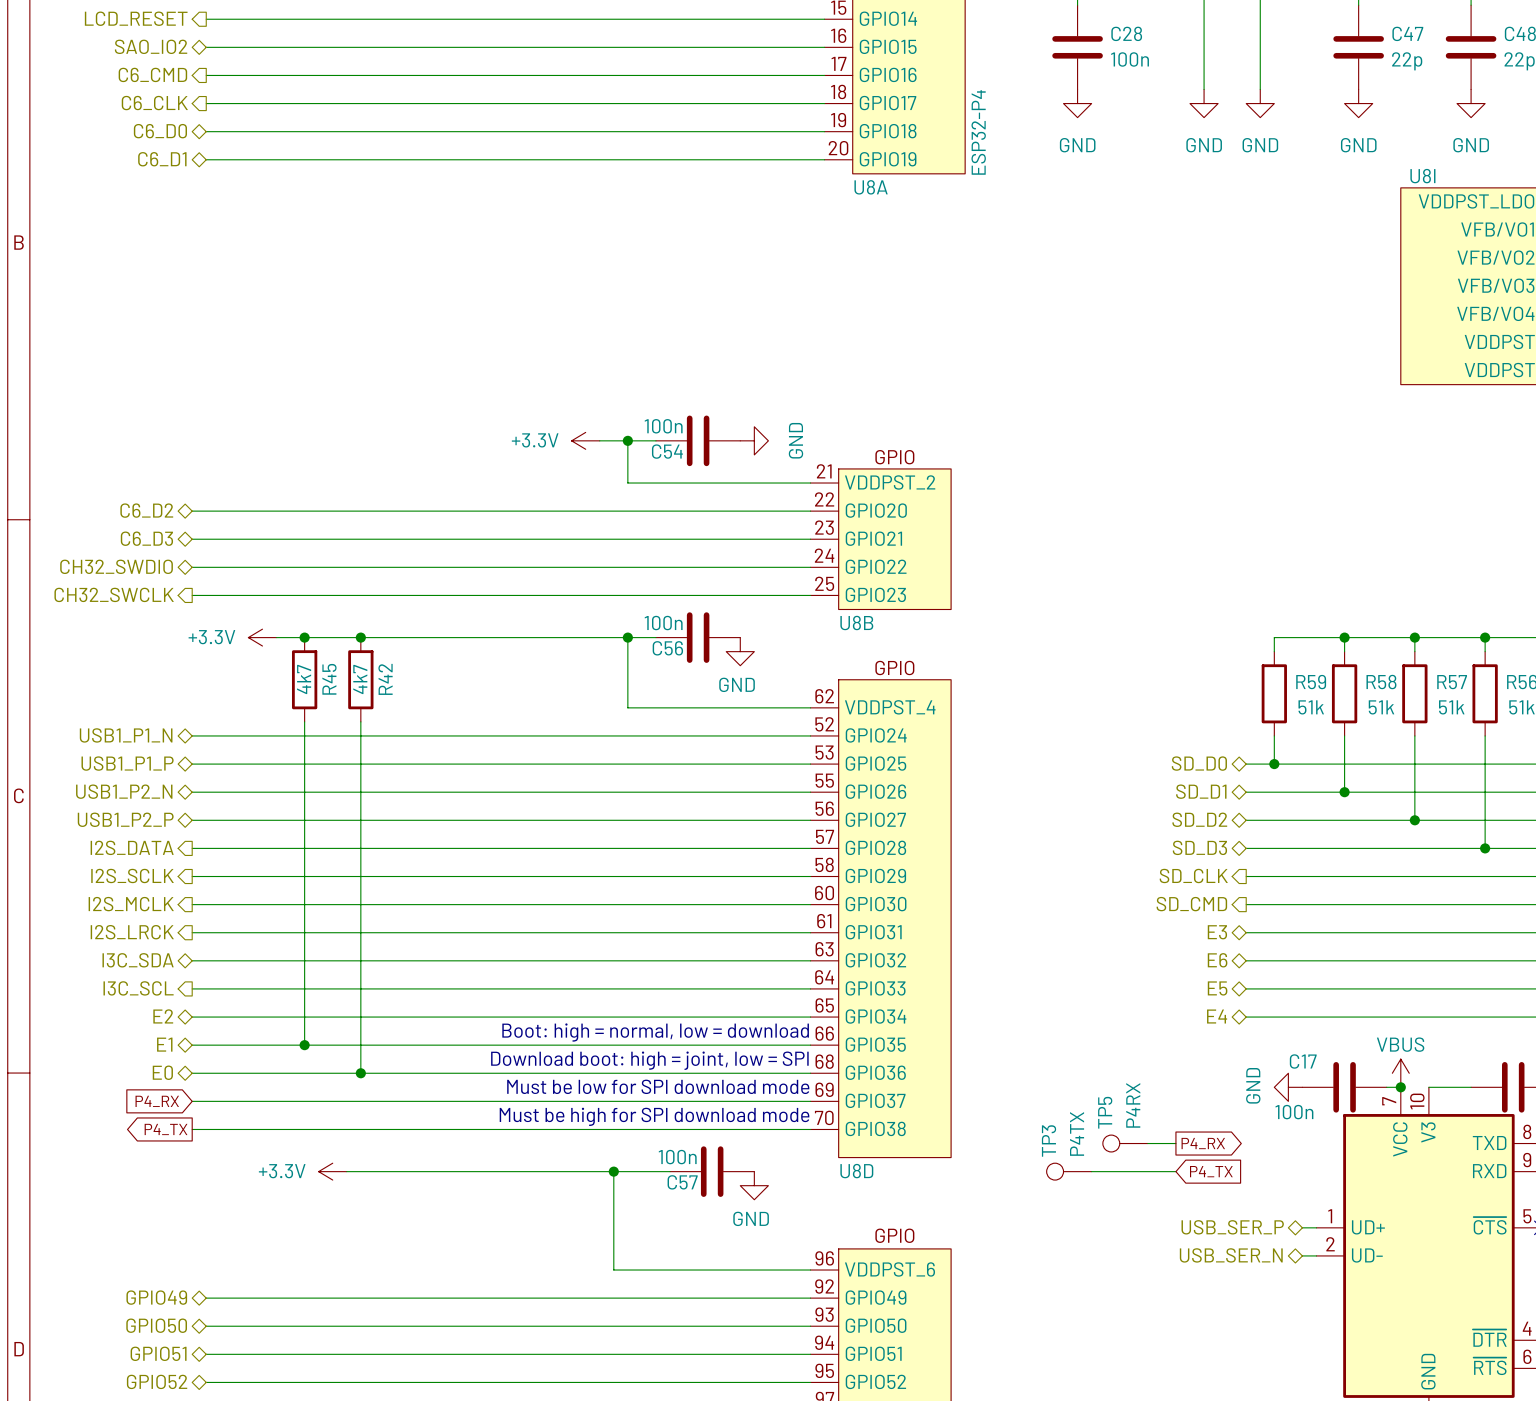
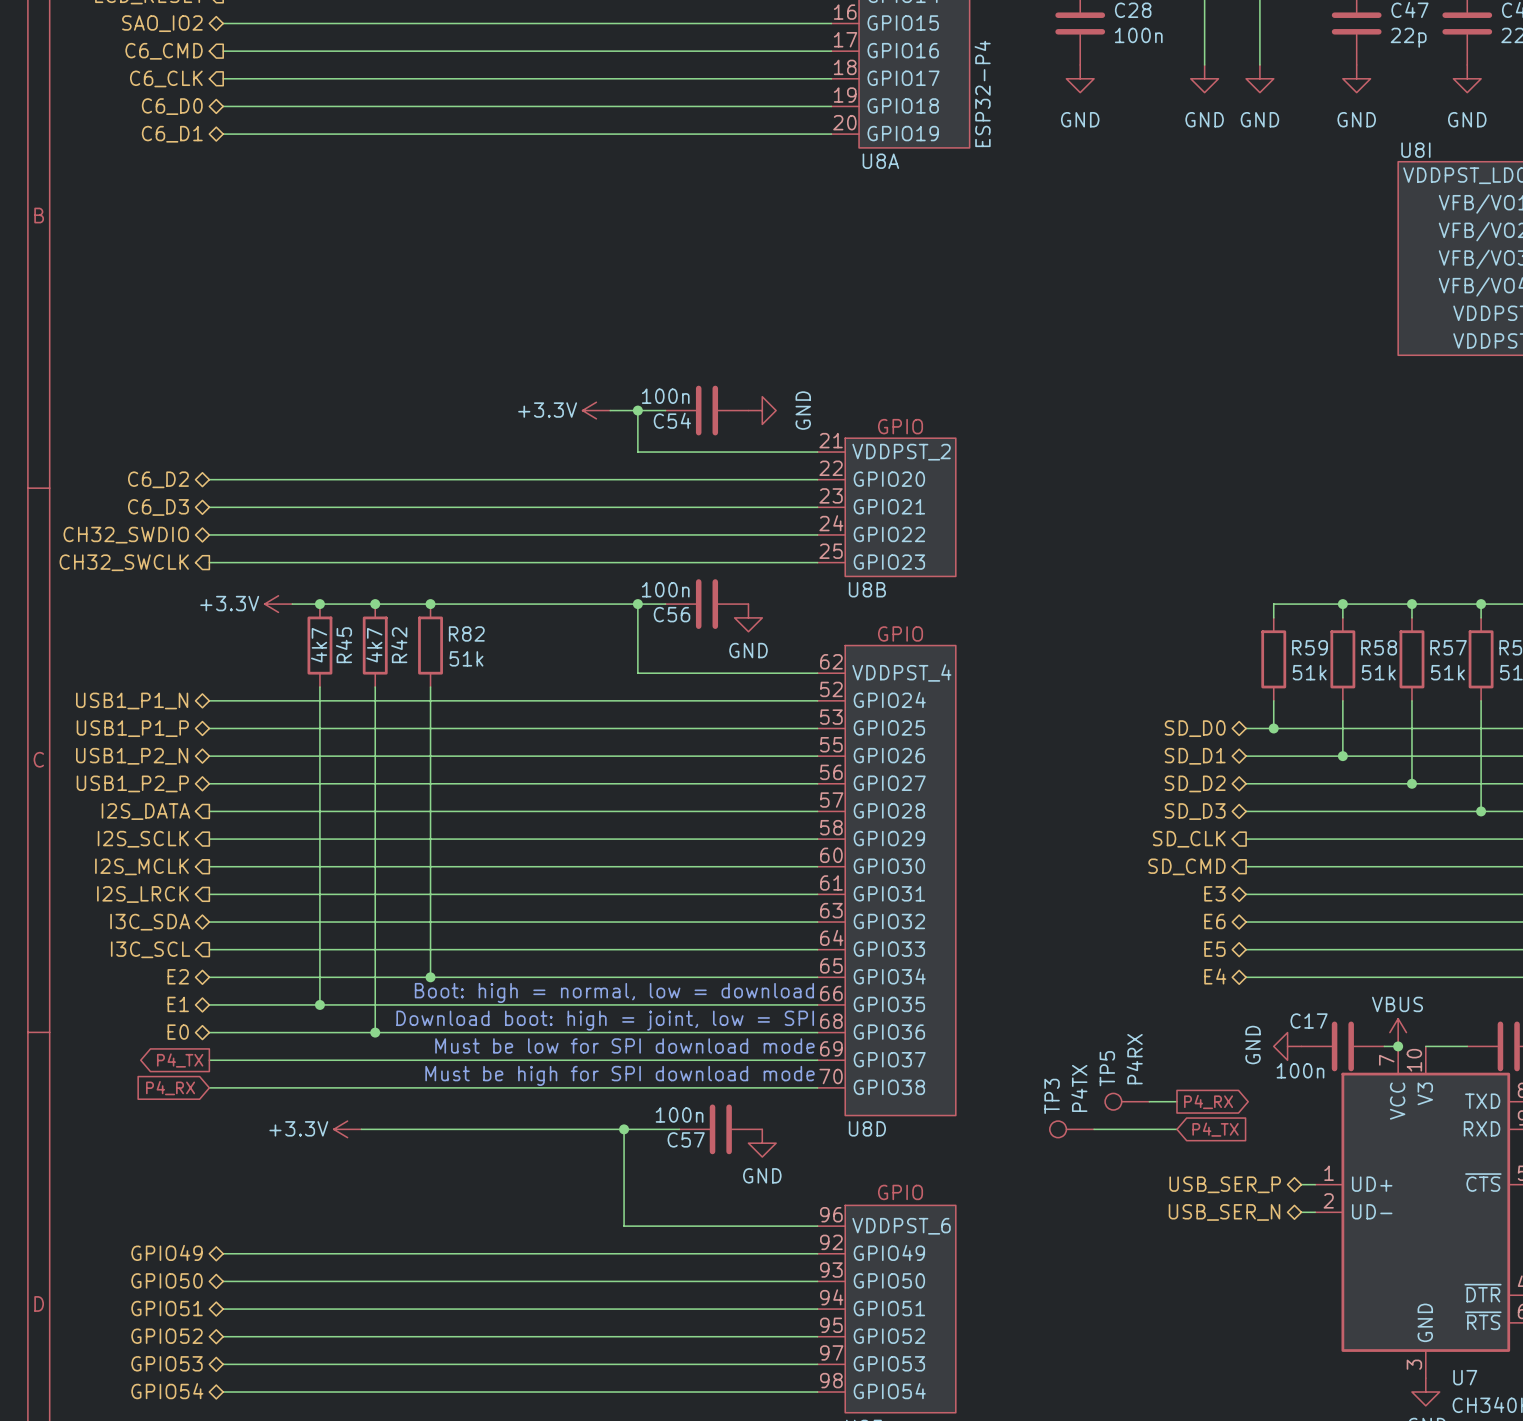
junction: none -> (430, 604)
R82: none -> 51k (430, 645)
wire: none -> (430, 687) (430, 977)
junction: none -> (430, 977)
global label shape: input (157, 1101) -> output (180, 1060)
global label: P4_RX (157, 1101) -> P4_TX (180, 1060)
global label shape: output (166, 1129) -> input (170, 1088)
global label: P4_TX (166, 1129) -> P4_RX (170, 1088)

